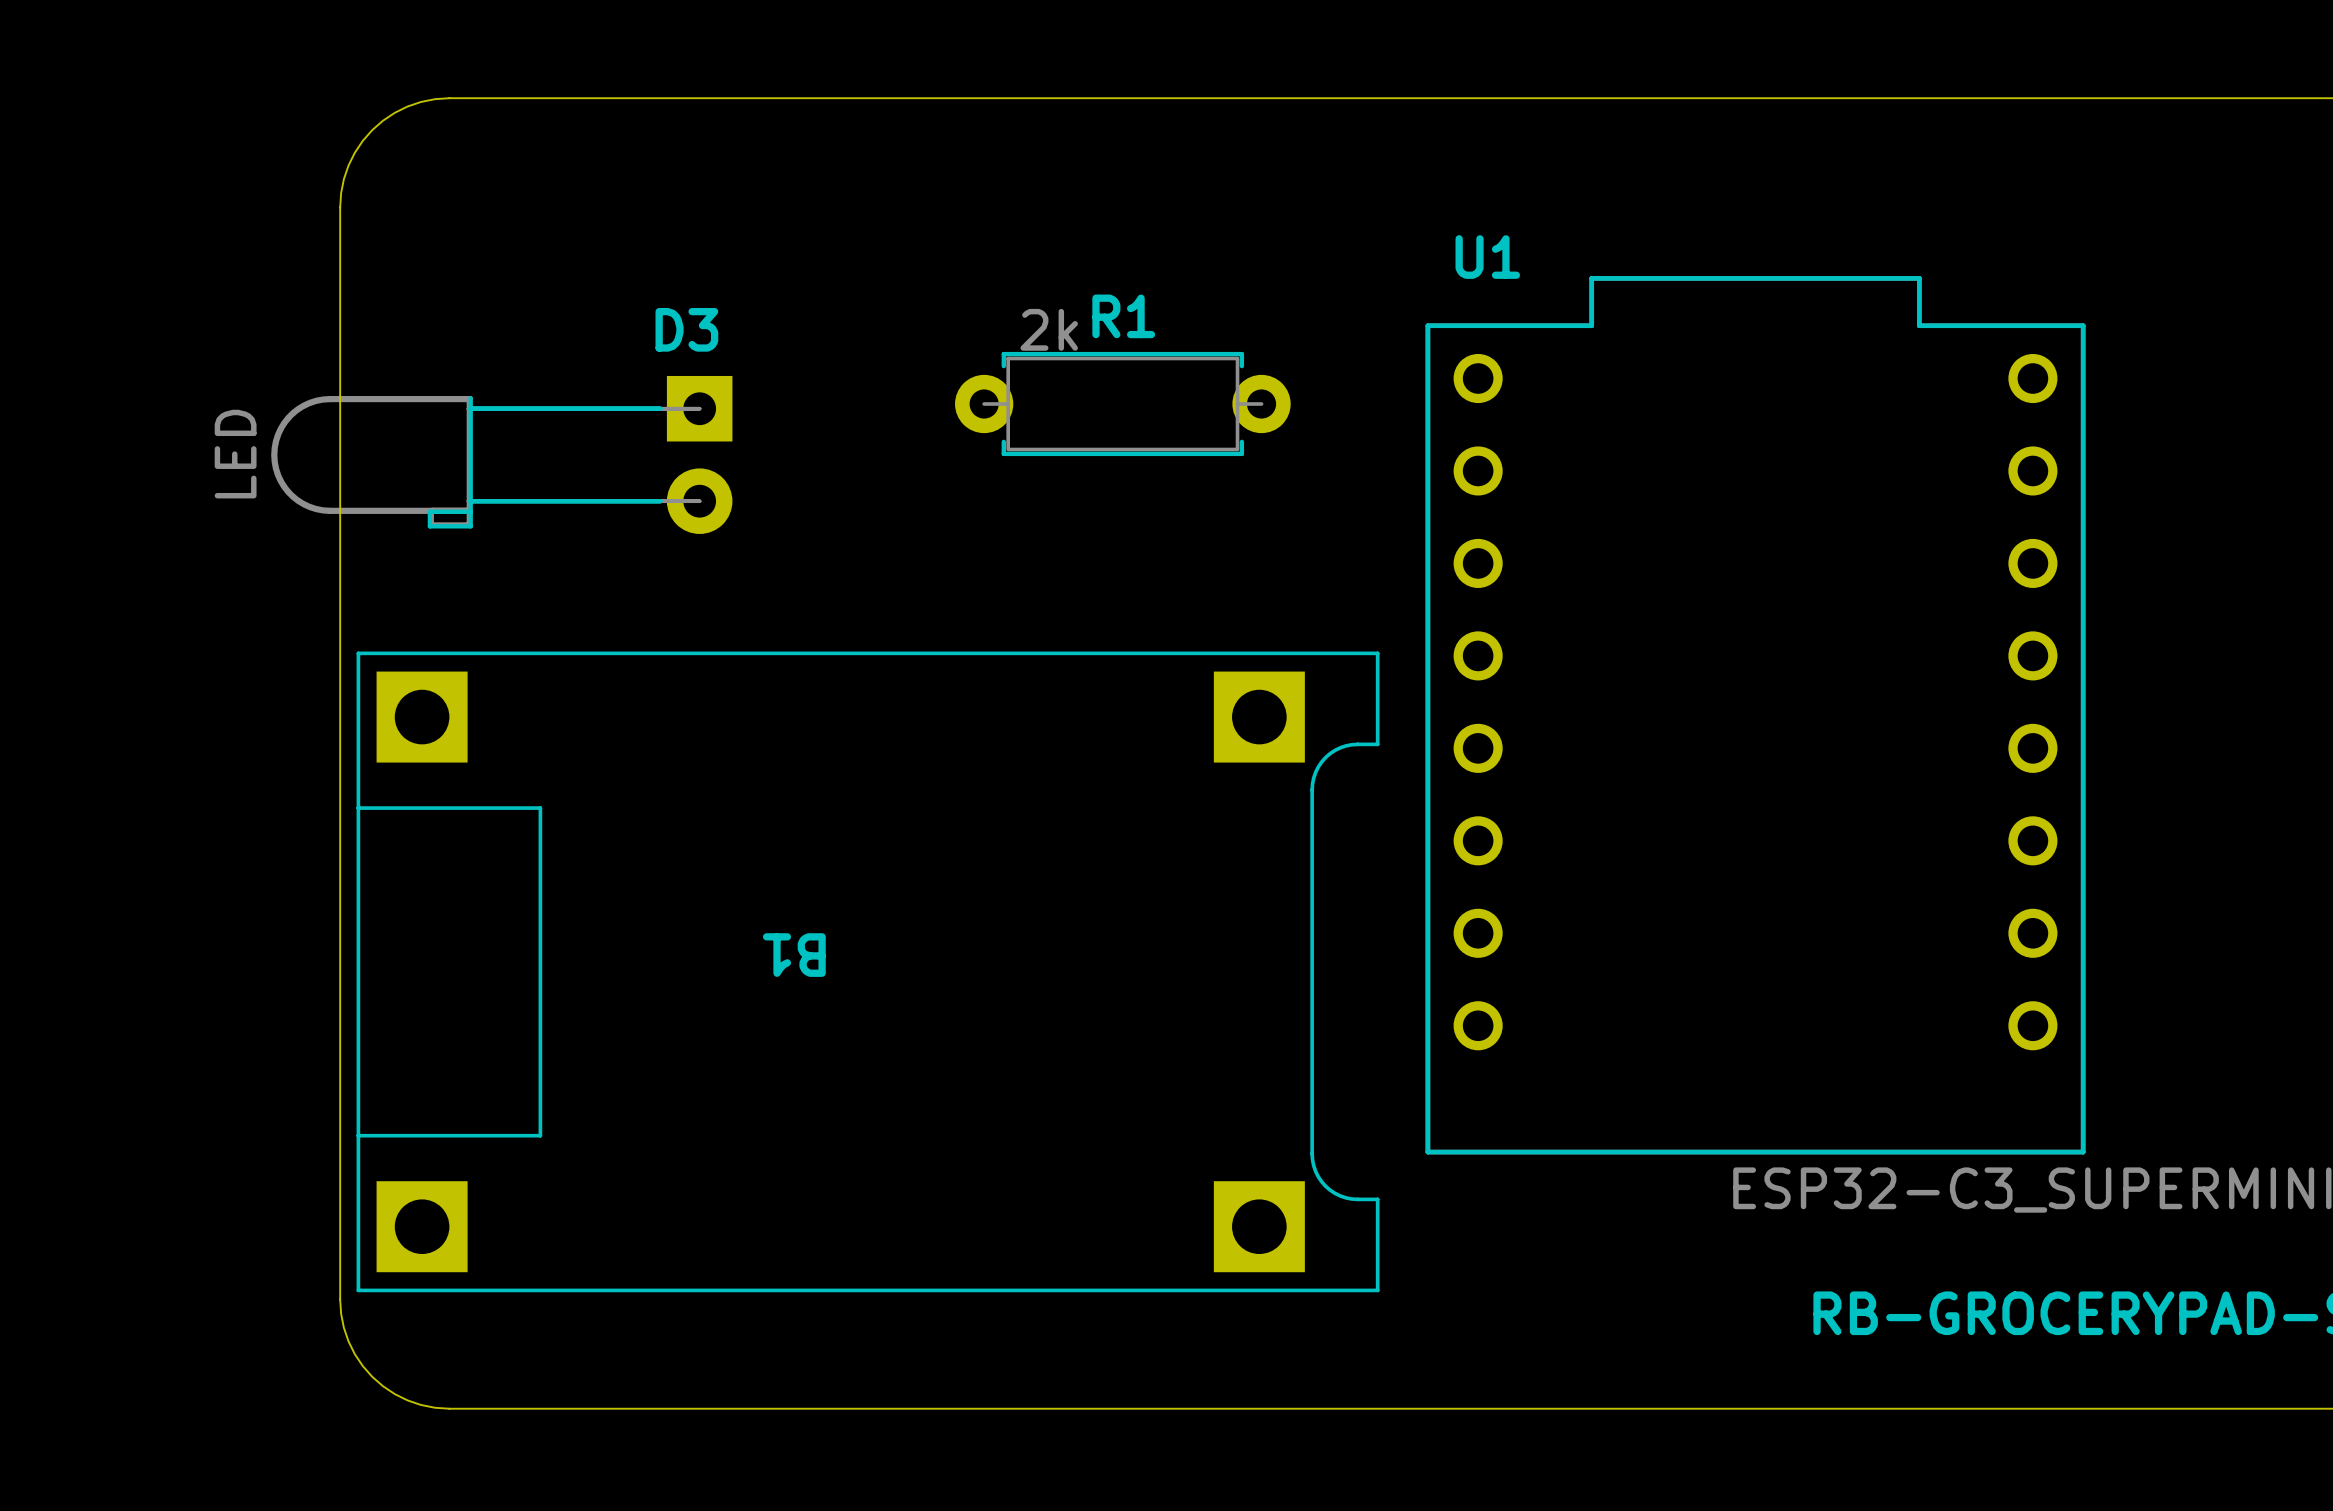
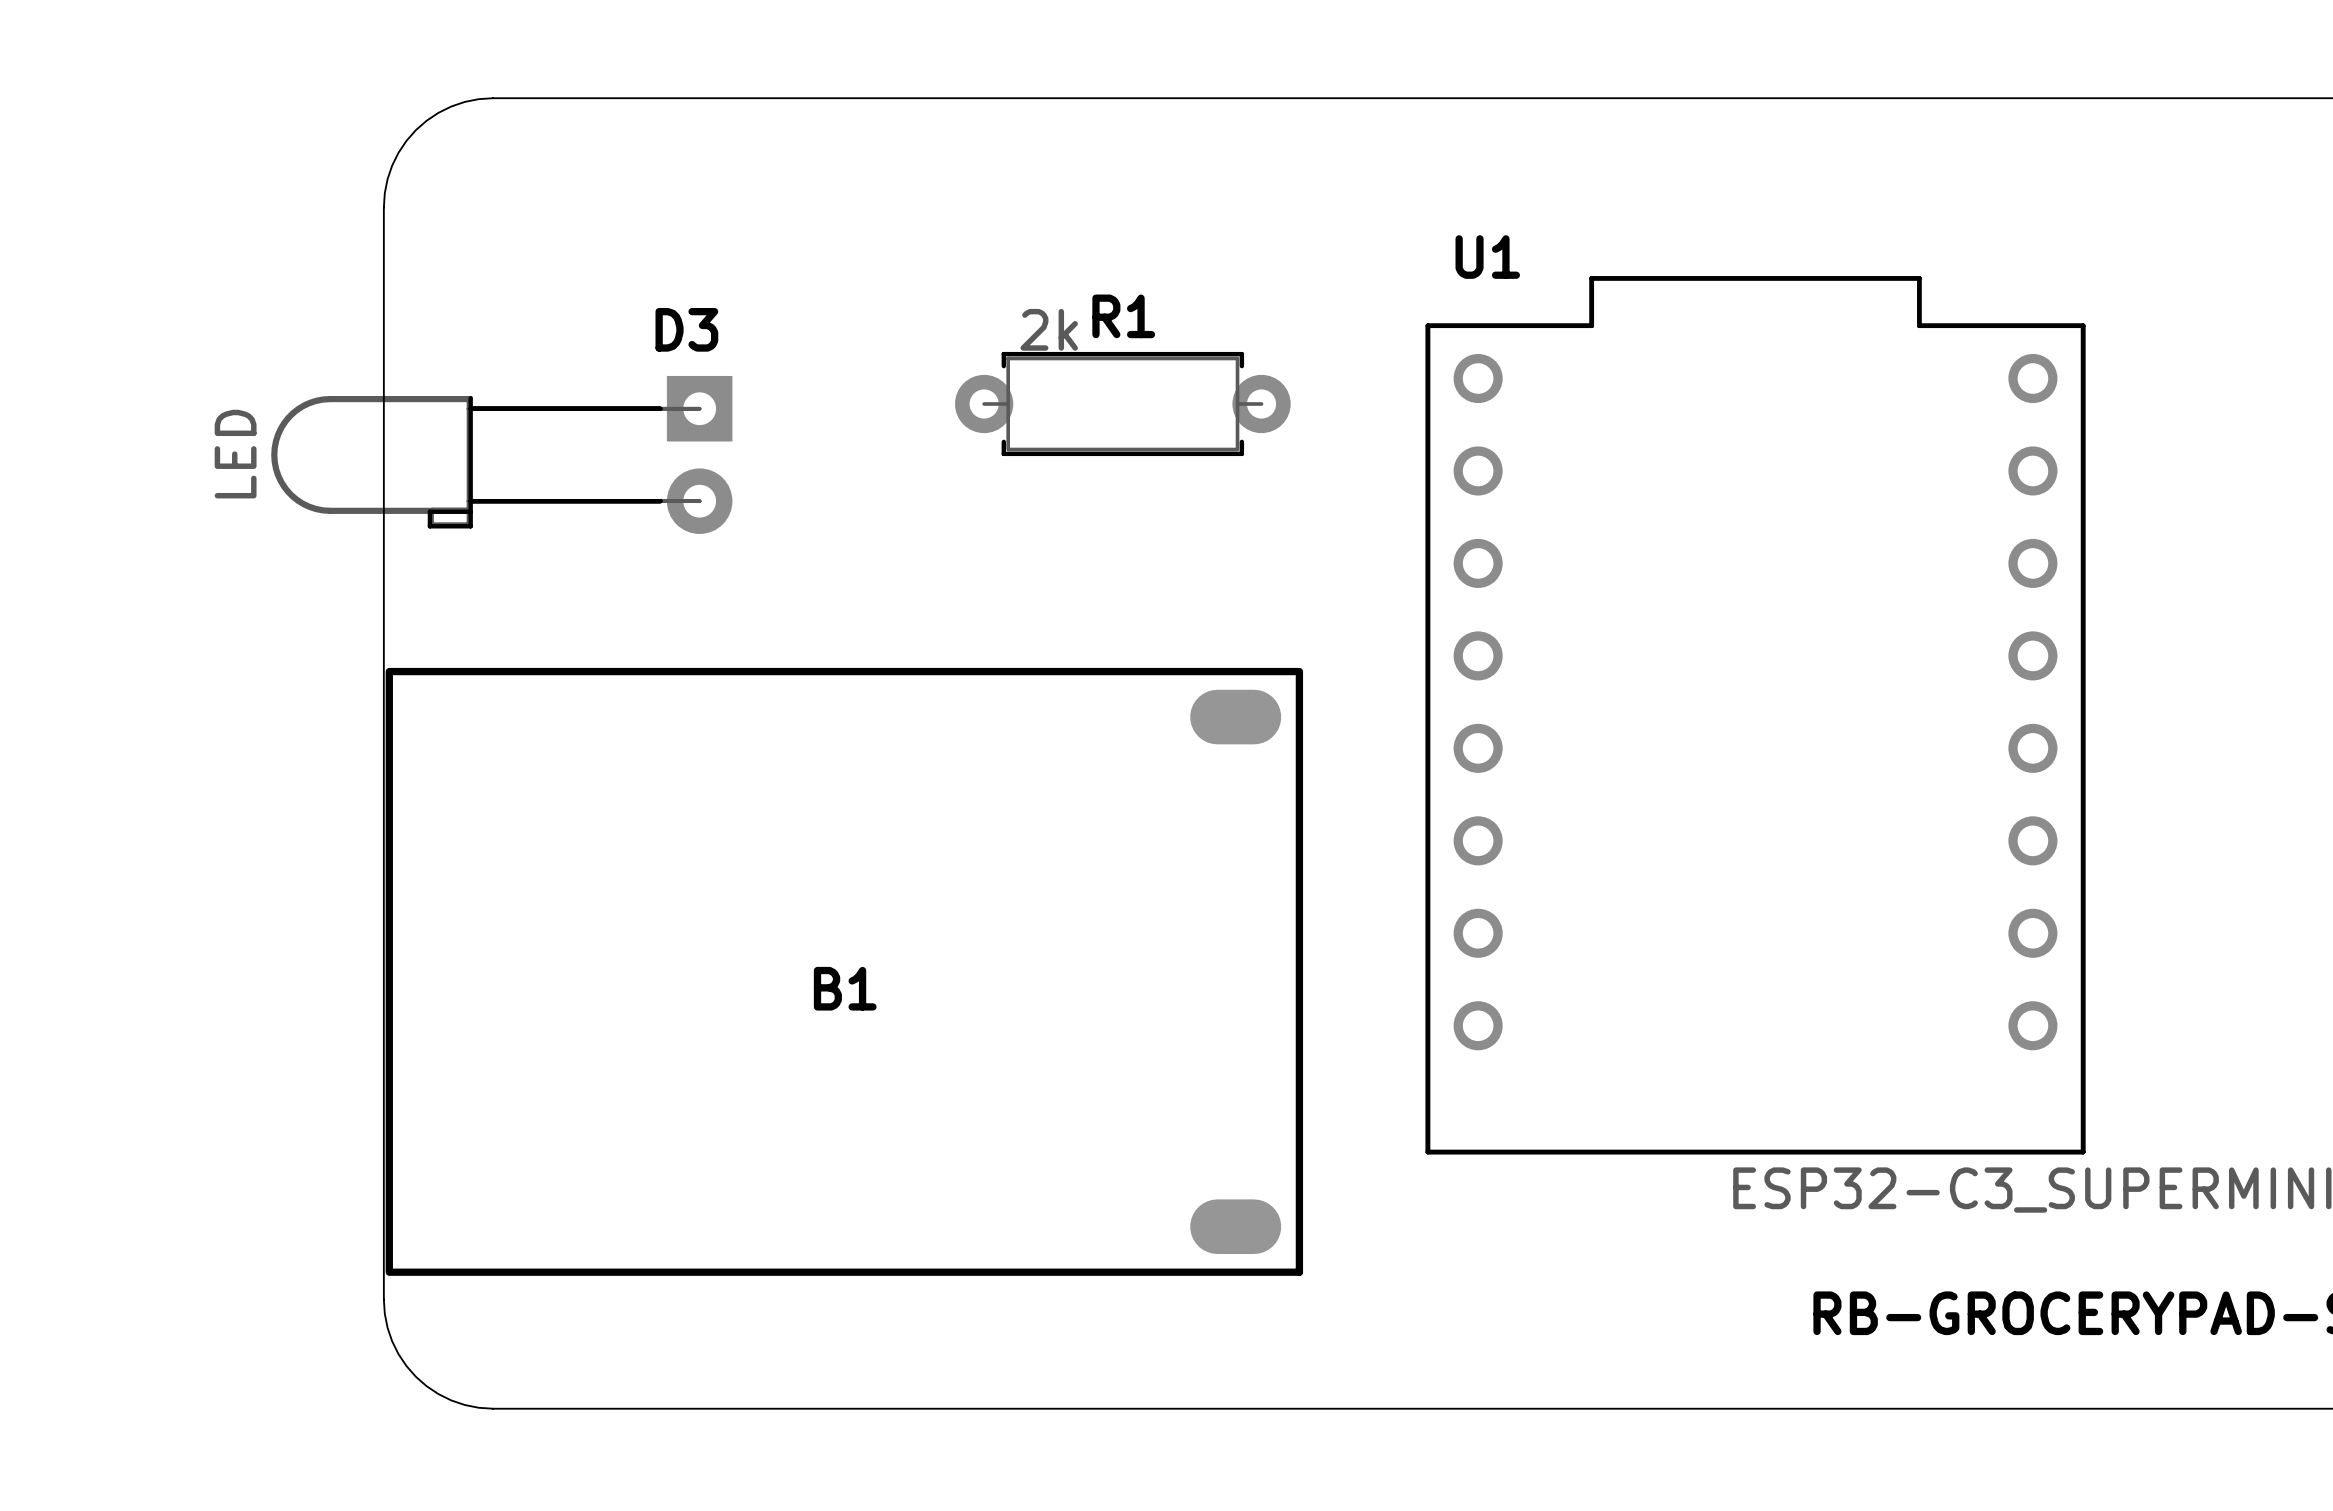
board edge: (493, 98) (449, 98) (421, 101) (394, 112) (382, 120) (362, 140) (354, 152) (343, 179) (340, 207) (341, 1313) (348, 1341) (354, 1354) (372, 1376) (394, 1394) (421, 1405) (435, 1407) (493, 1408) -> (493, 98) (478, 99) (451, 106) (438, 112) (415, 130) (406, 140) (392, 165) (387, 179) (383, 207) (384, 1313) (392, 1341) (398, 1354) (406, 1365) (426, 1386) (451, 1400) (478, 1407) (493, 1408)
B1 footprint: [356, 651, 1380, 1293] -> [385, 667, 1304, 1276]
B1 name position: B1 (794, 955) -> B1 (845, 988)

